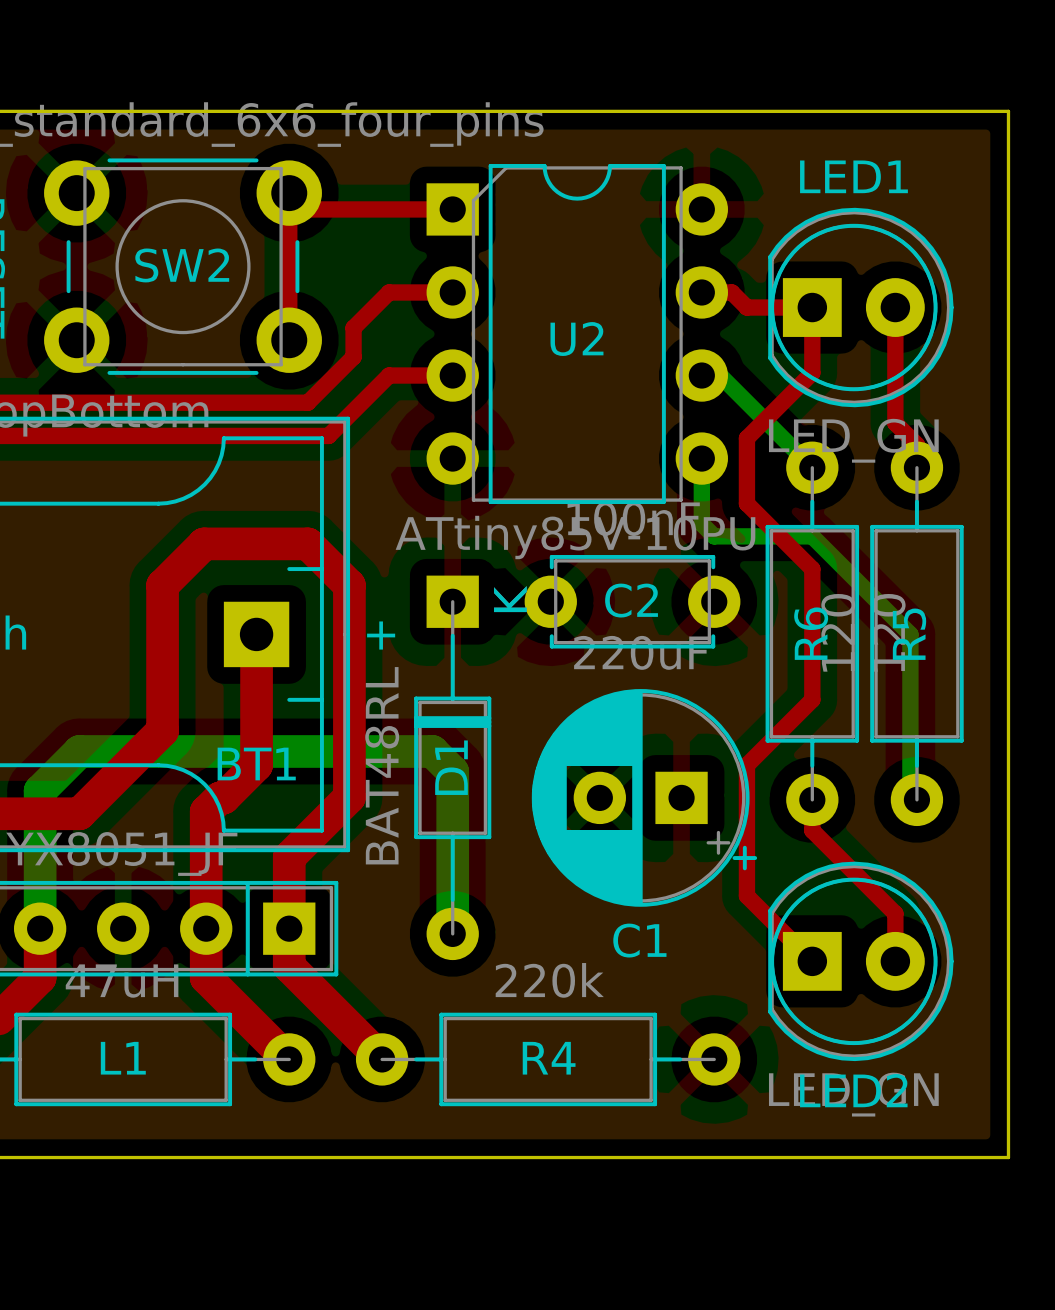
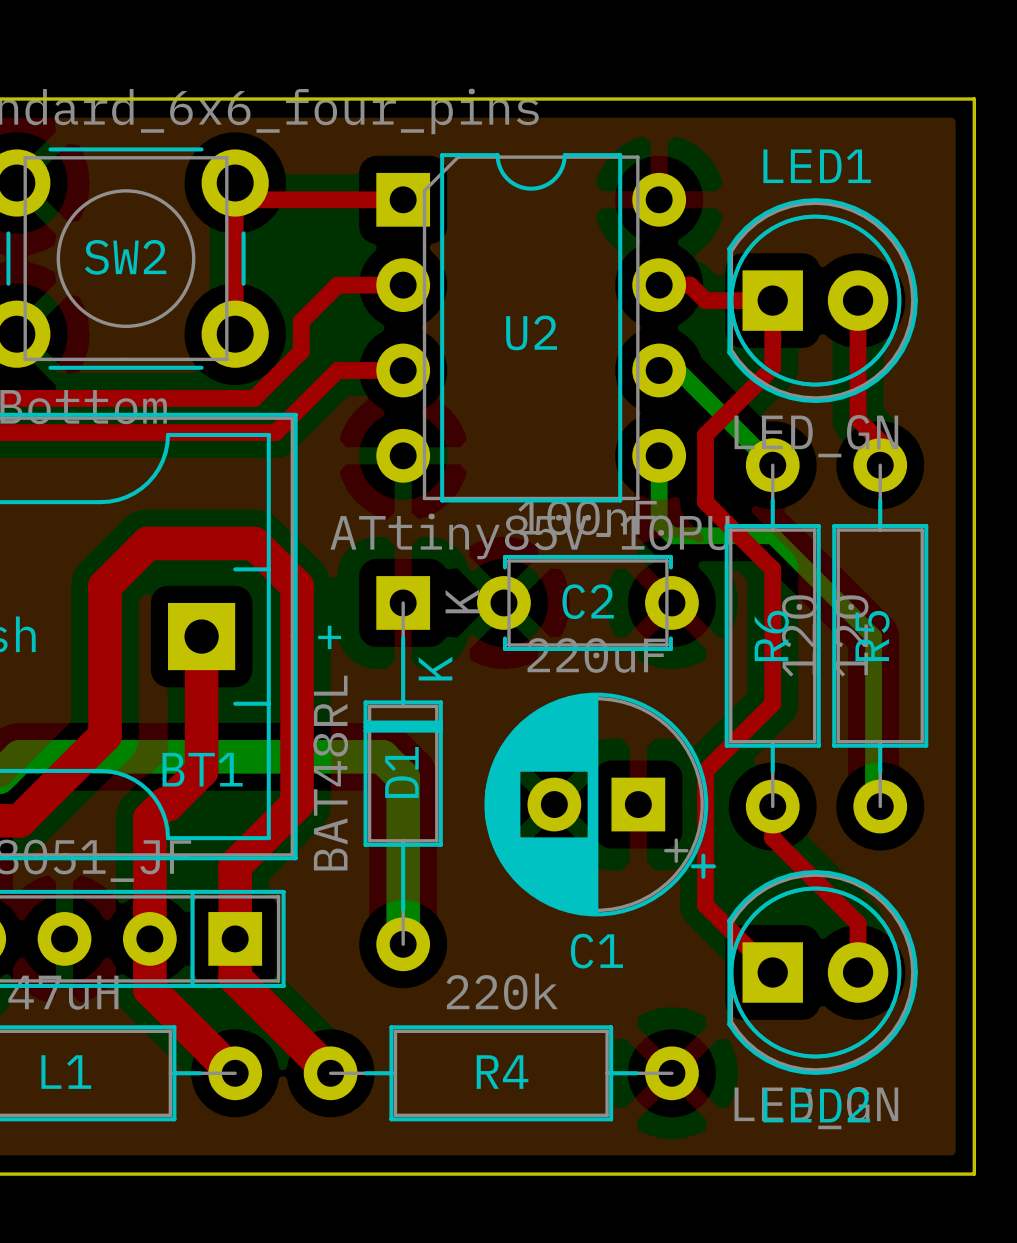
D1 footprint: [414, 575, 492, 961] -> [363, 576, 443, 972]

